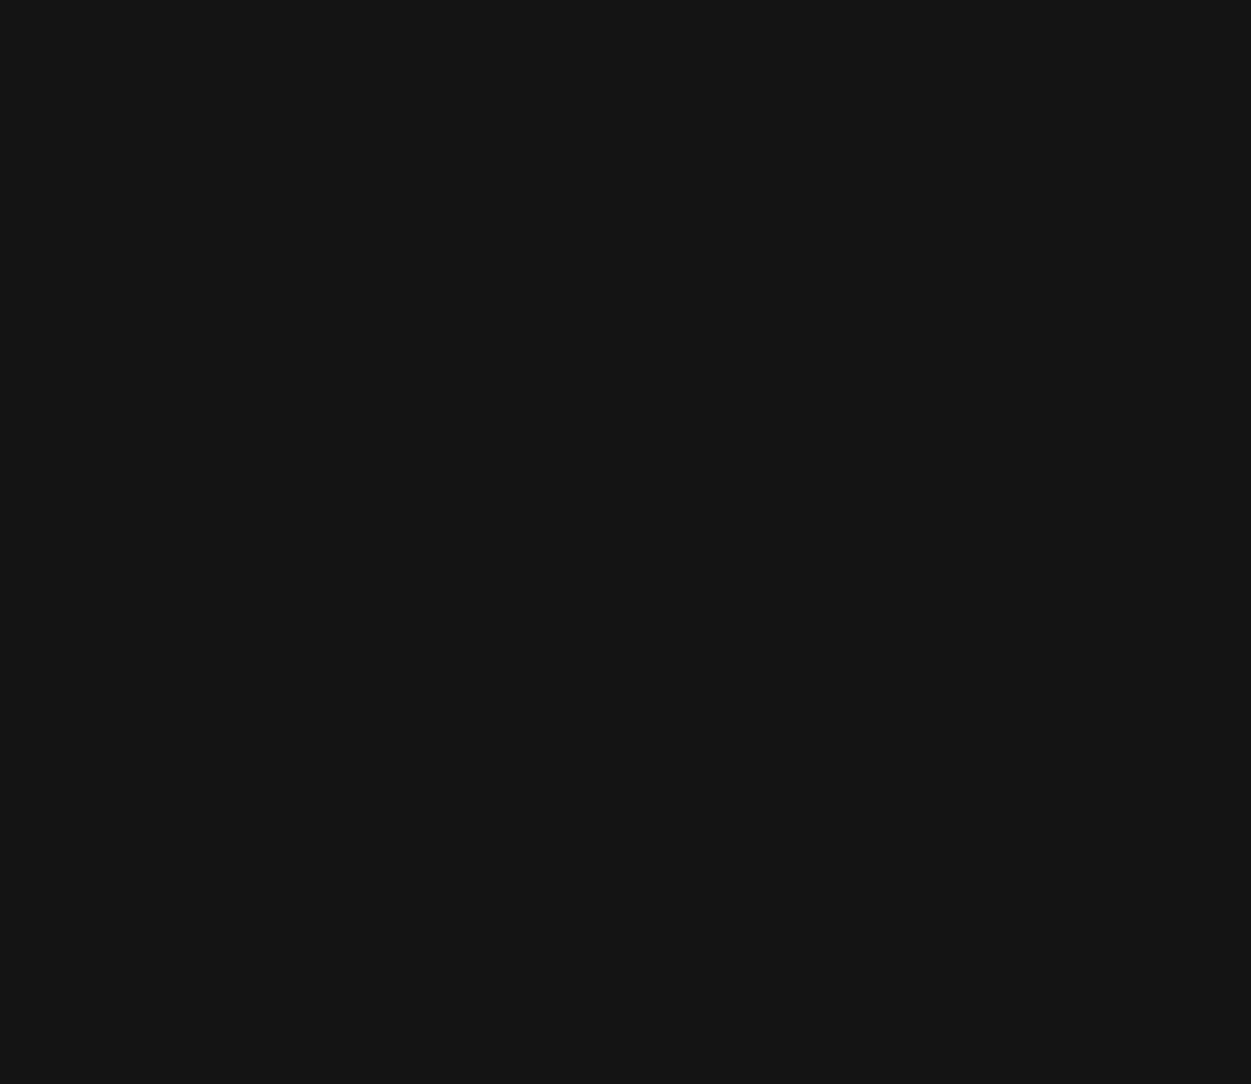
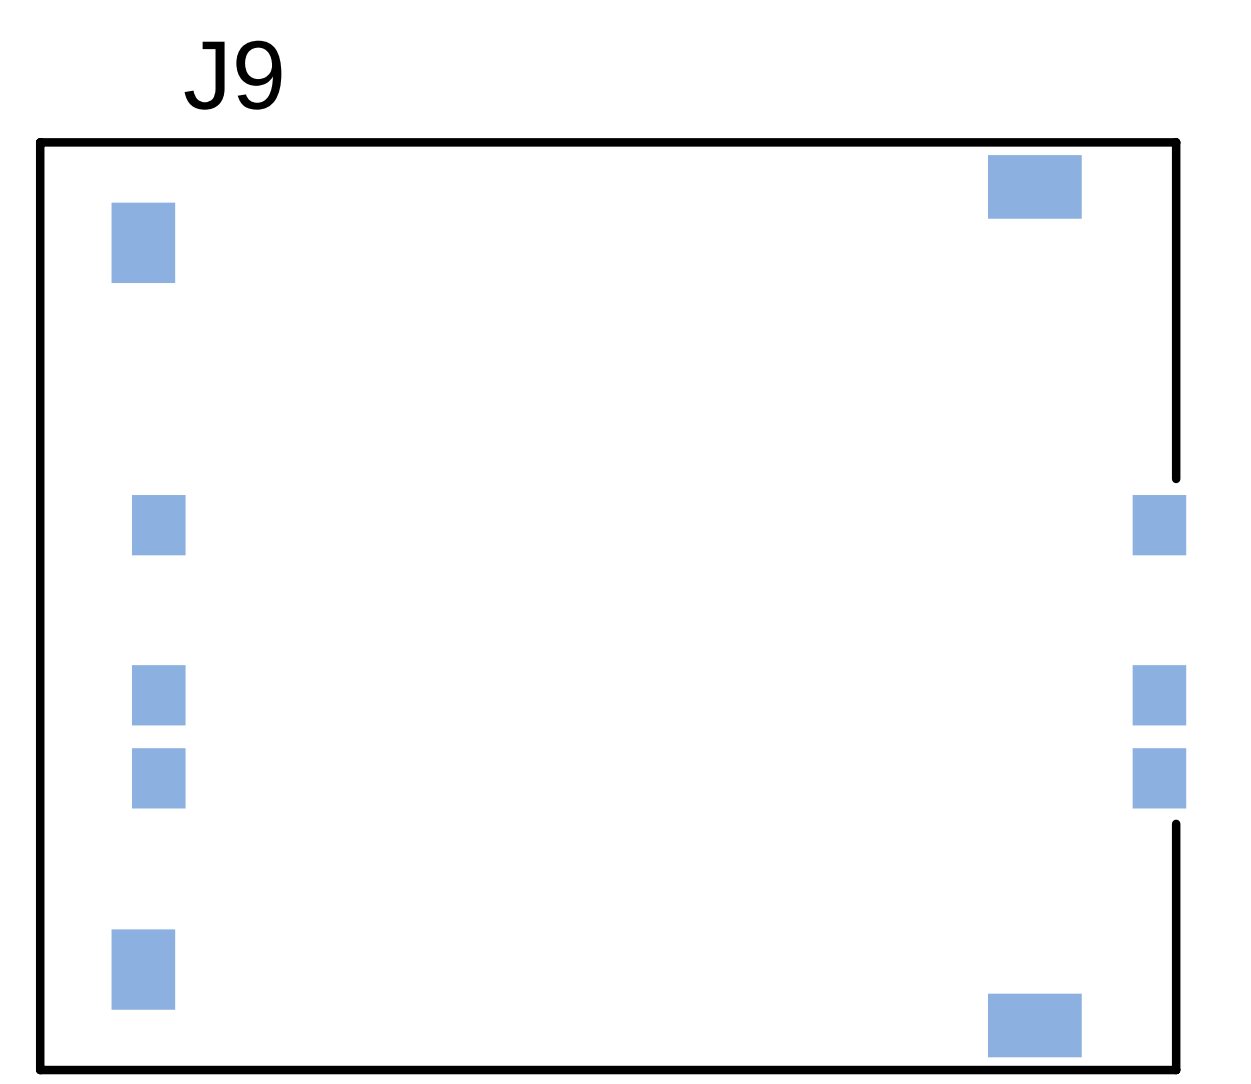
J9: none -> (611, 606)

